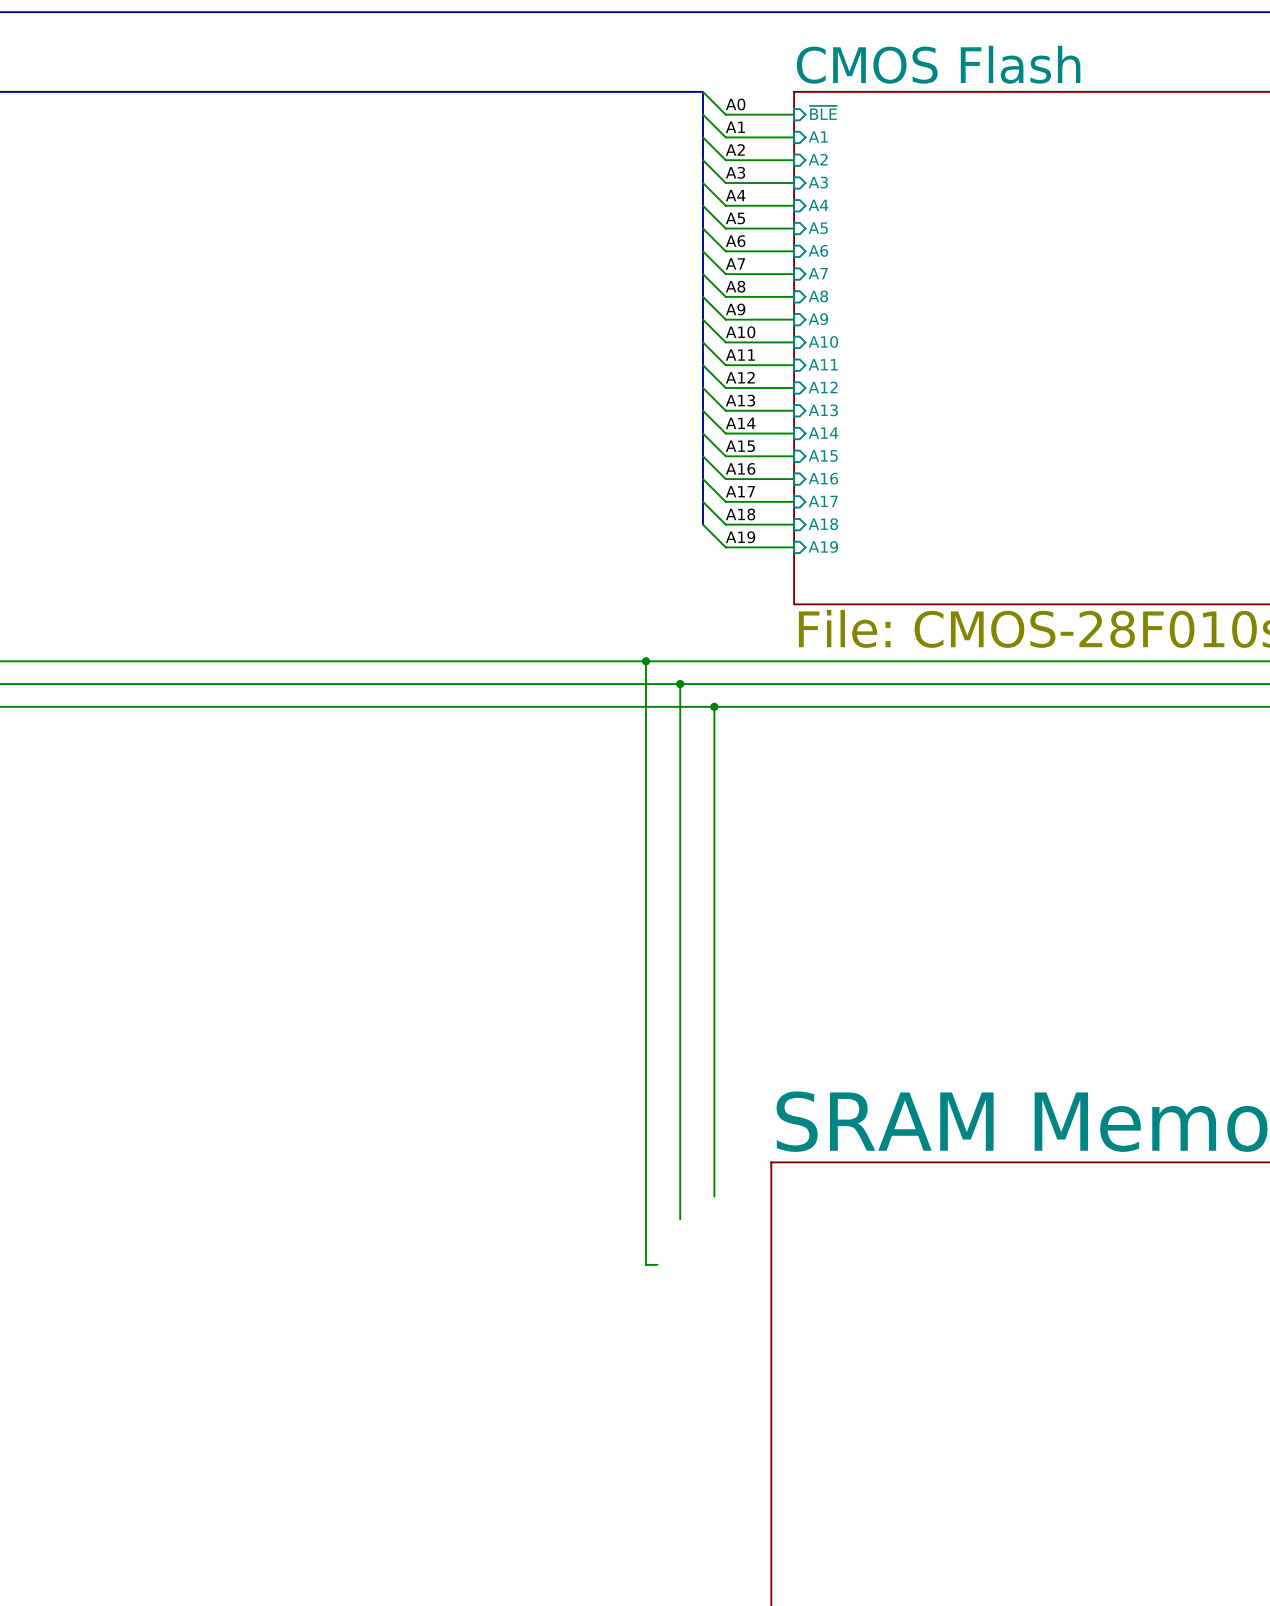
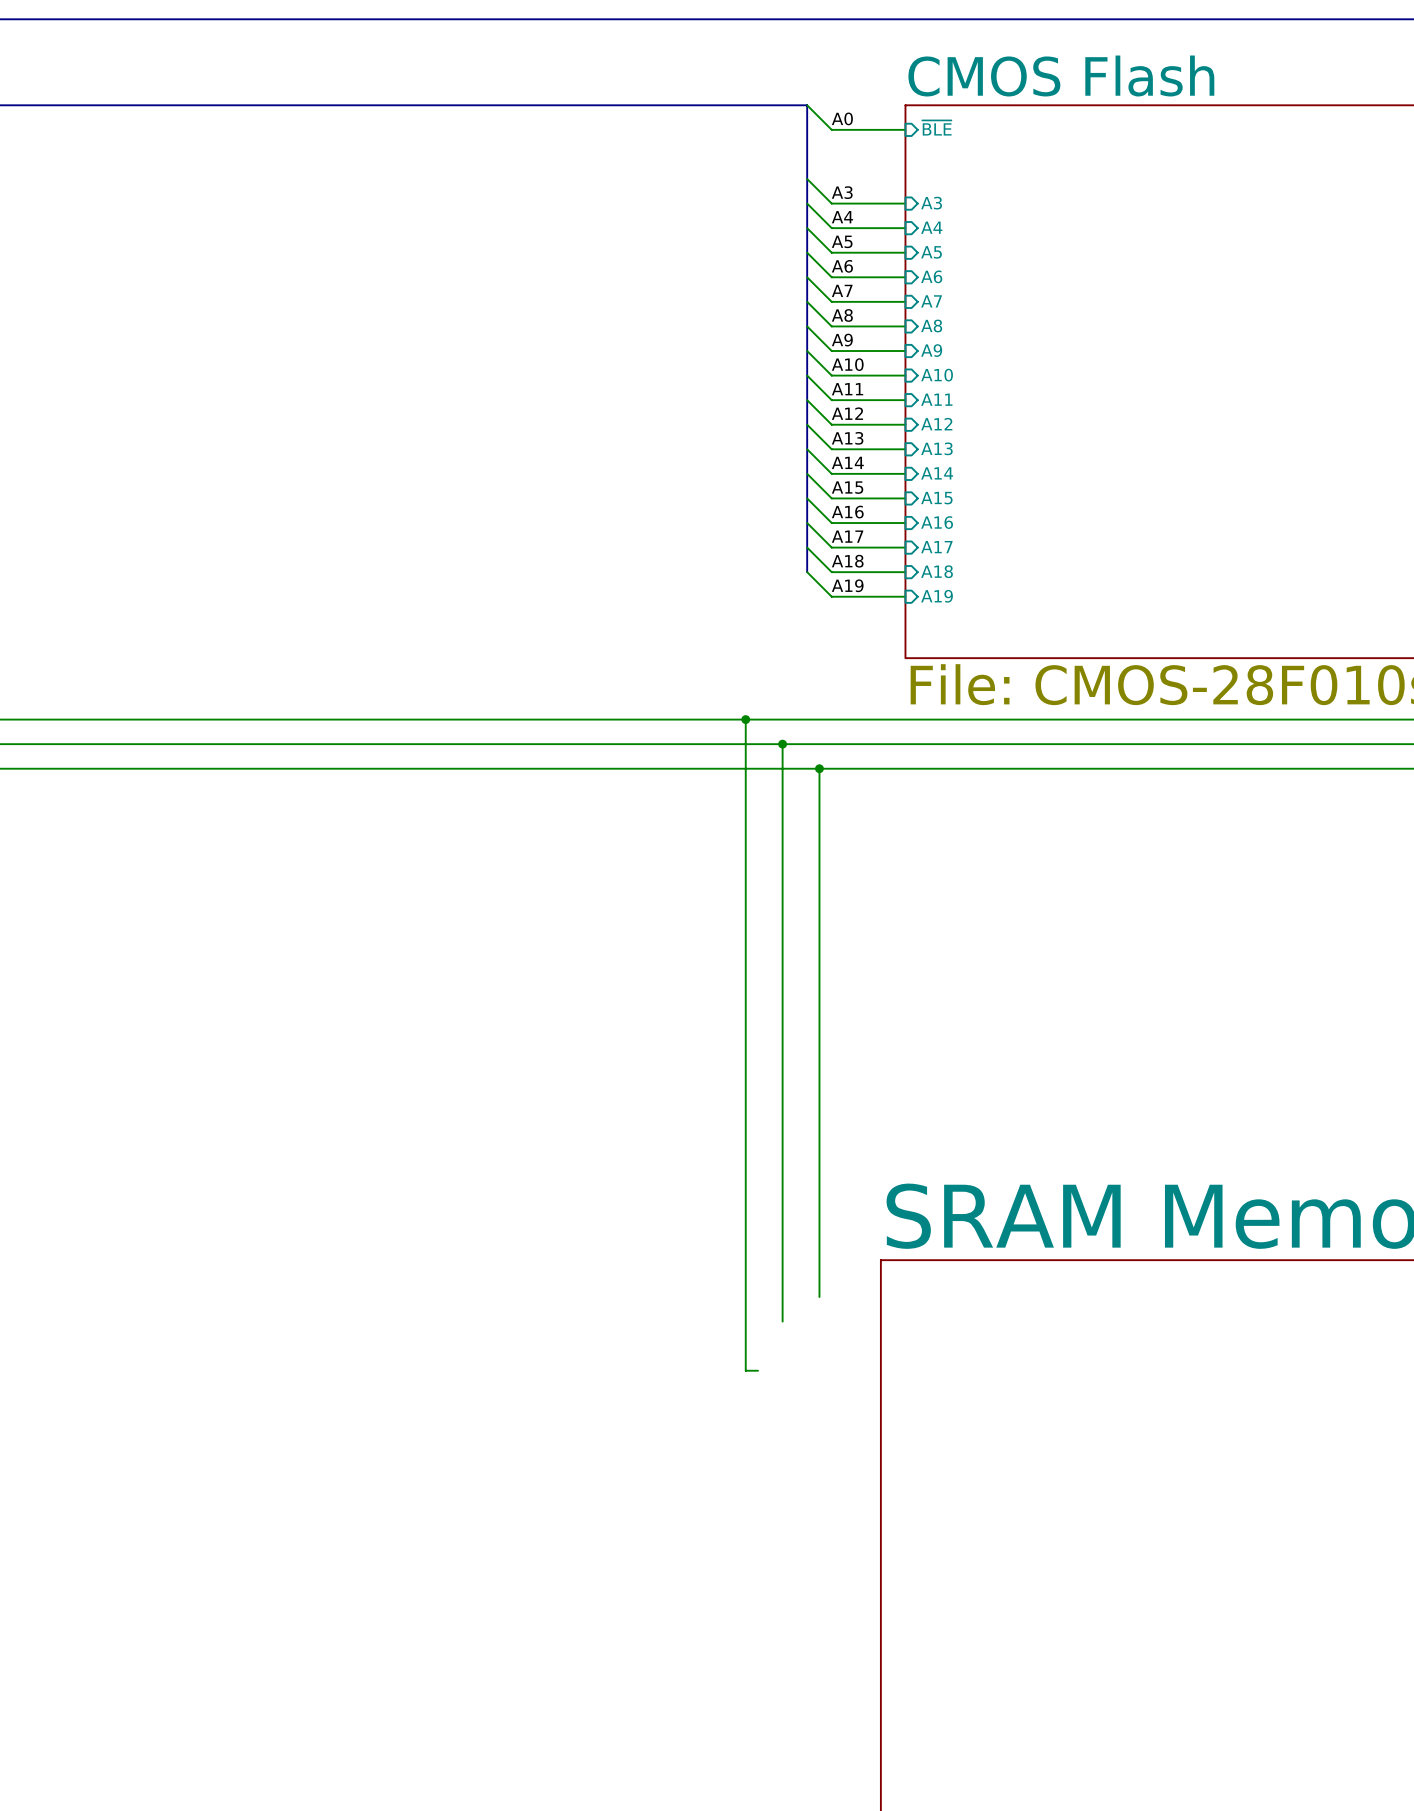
wire: (702, 114) (725, 137) (794, 137) -> none
label: A1 (735, 127) -> none
wire: (702, 137) (725, 160) (794, 160) -> none
sheet pin: A1 (818, 137) -> none
label: A2 (735, 149) -> none
sheet pin: A2 (818, 159) -> none

